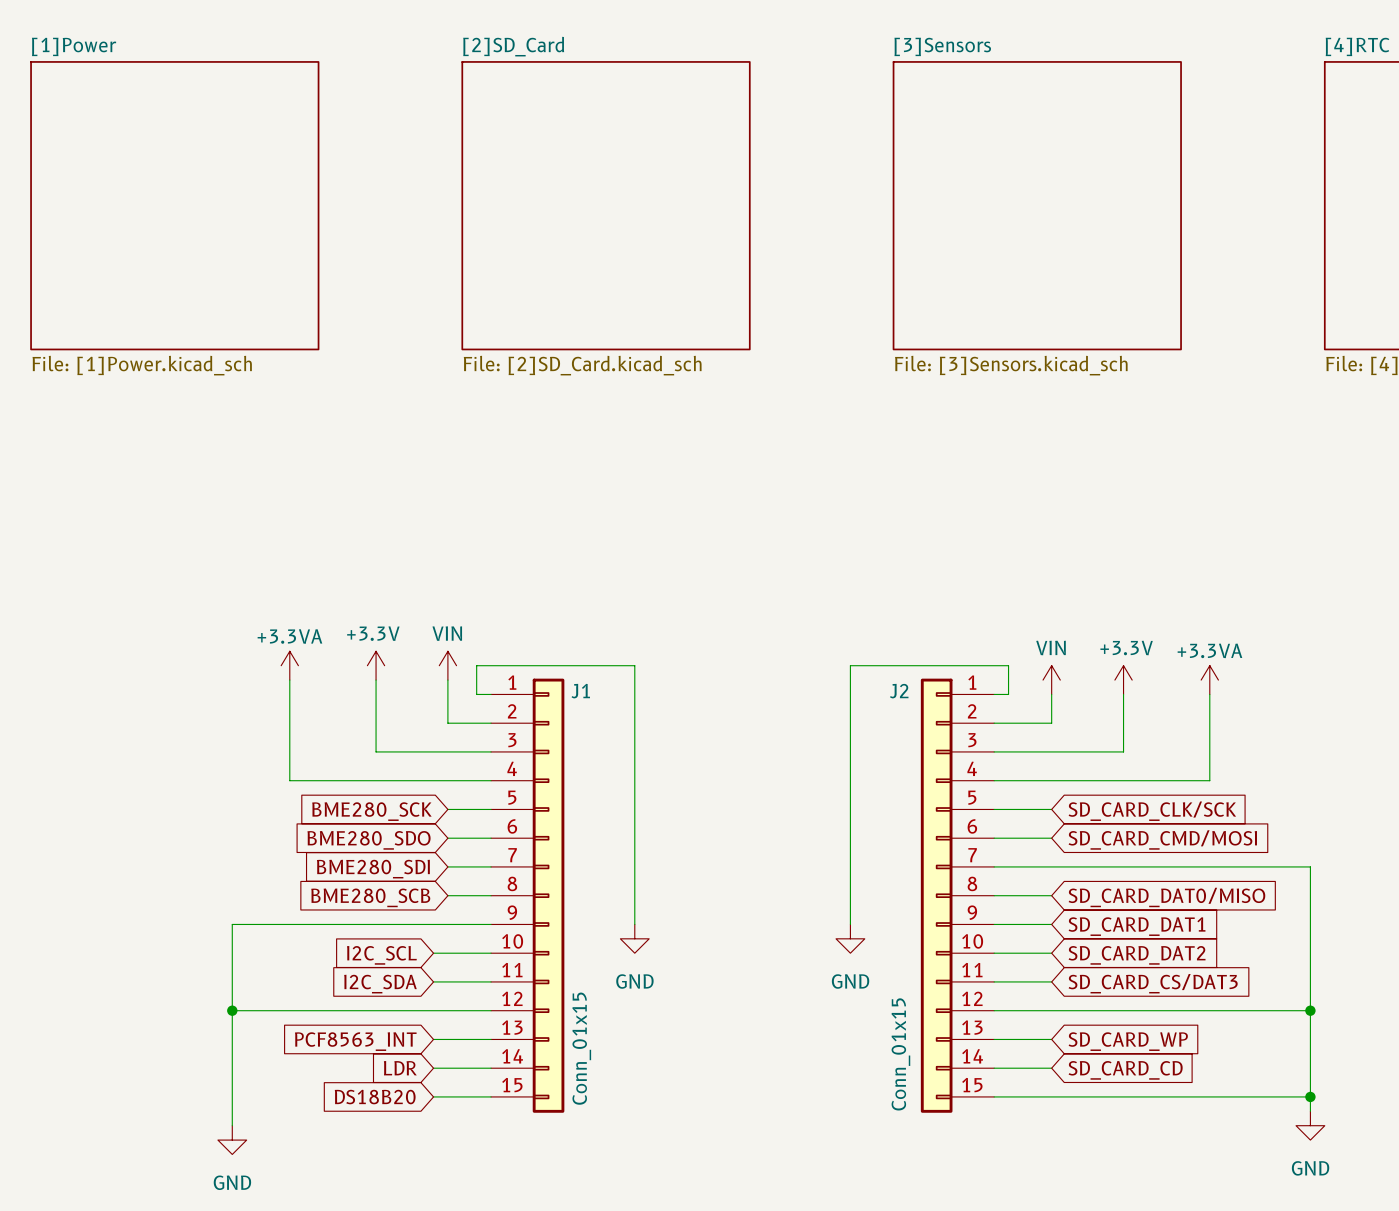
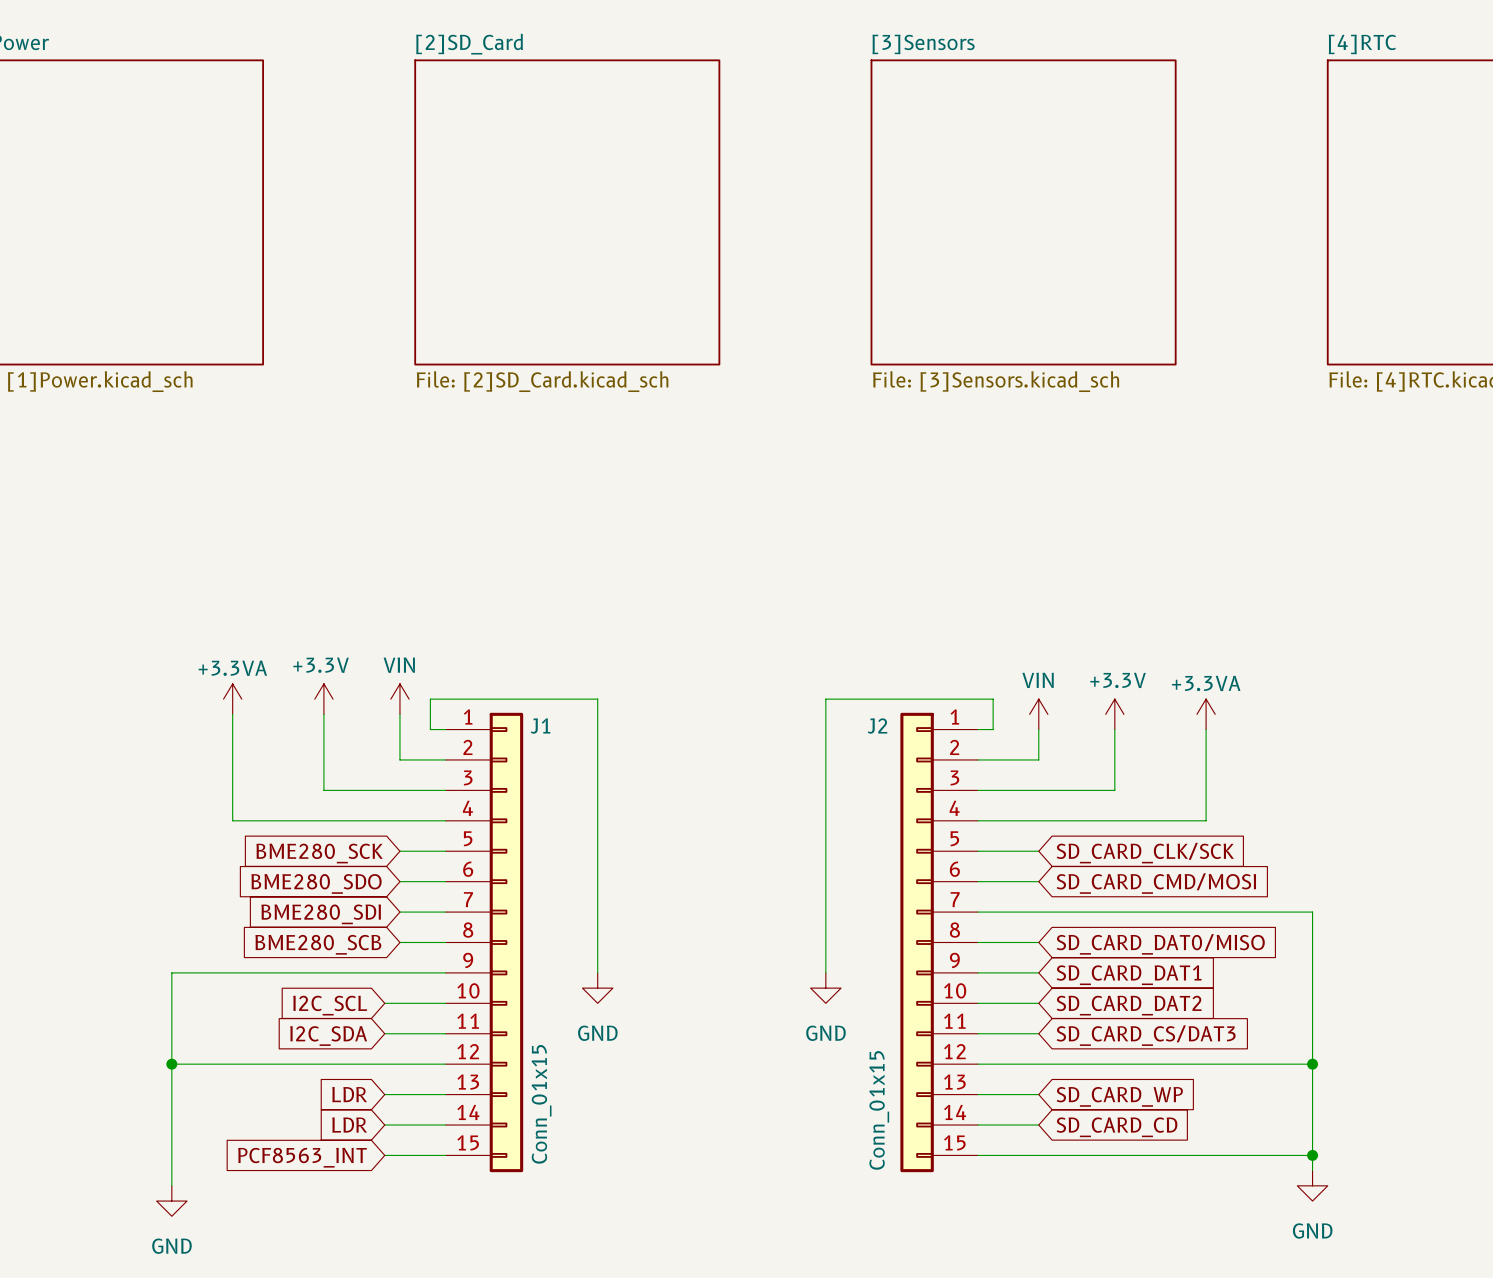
global label: PCF8563_INT (355, 1041) -> LDR (349, 1094)
global label: DS18B20 (375, 1097) -> PCF8563_INT (302, 1157)

